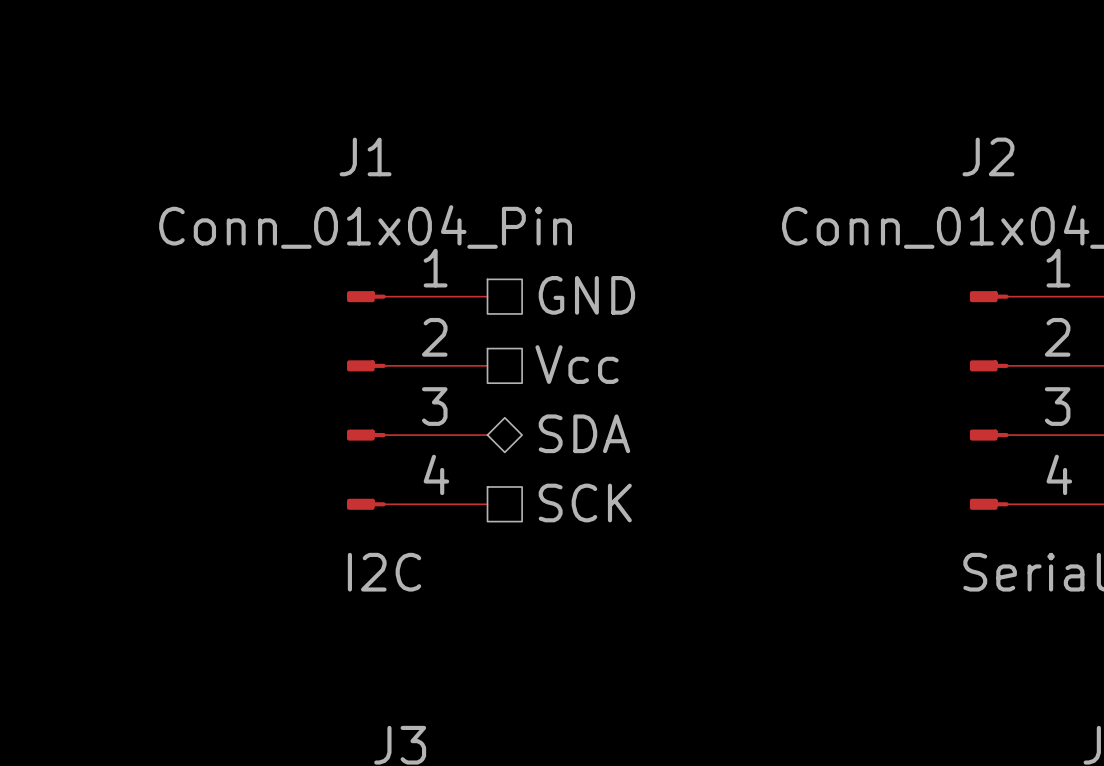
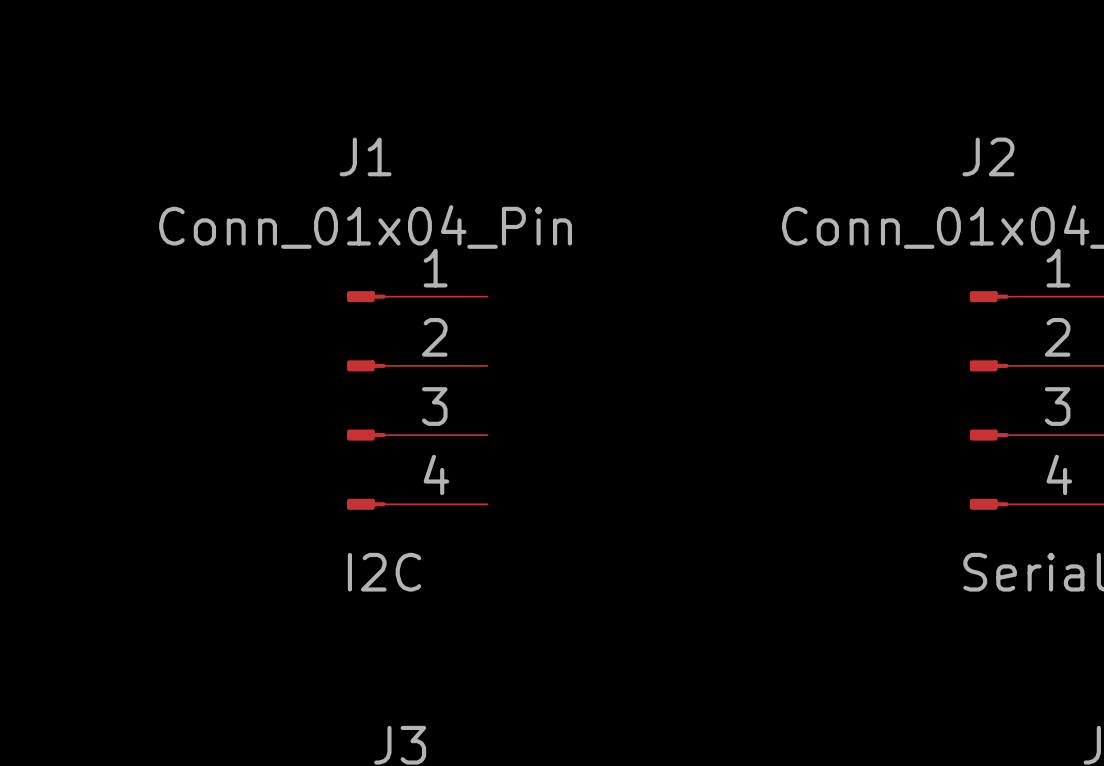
hierarchical label: GND (586, 295) -> none
hierarchical label: Vcc (577, 364) -> none
hierarchical label: SDA (584, 433) -> none
hierarchical label: SCK (585, 502) -> none

